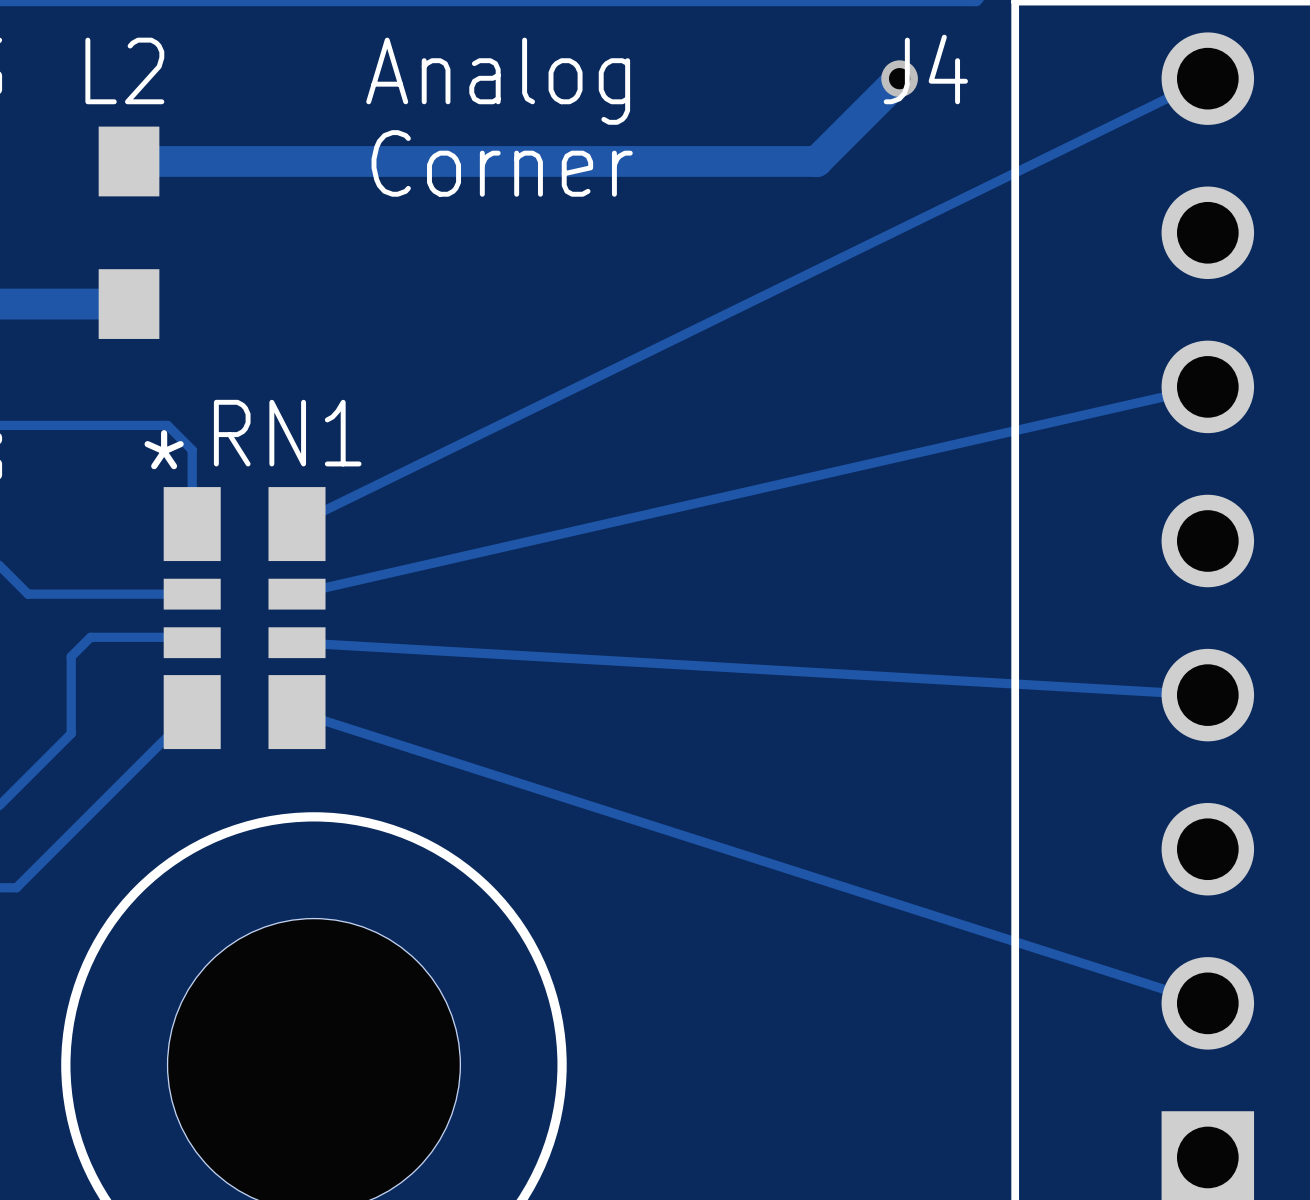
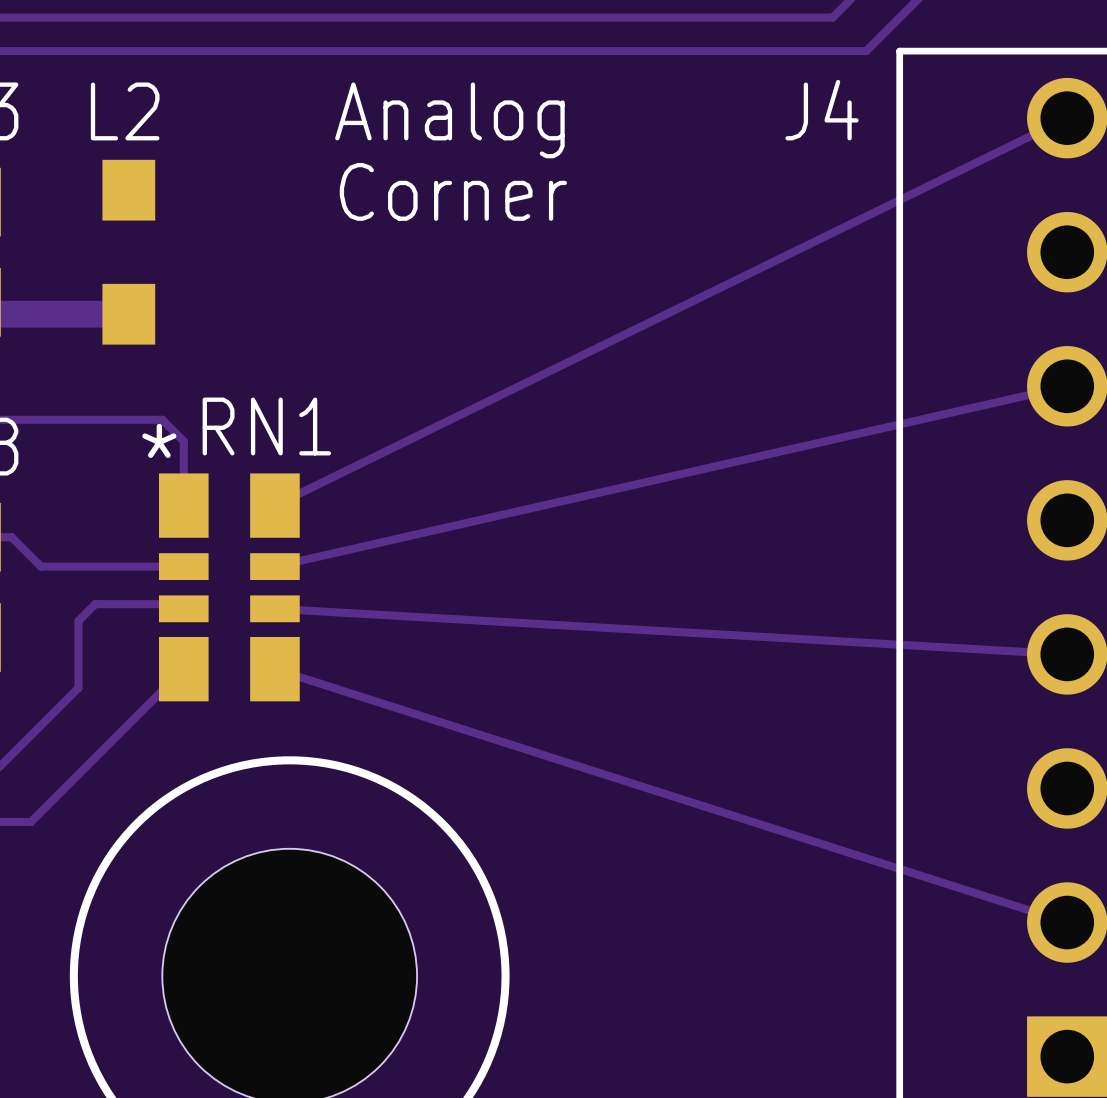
track: (899, 78) (816, 161) (129, 161) -> none
via: (899, 78) -> none

